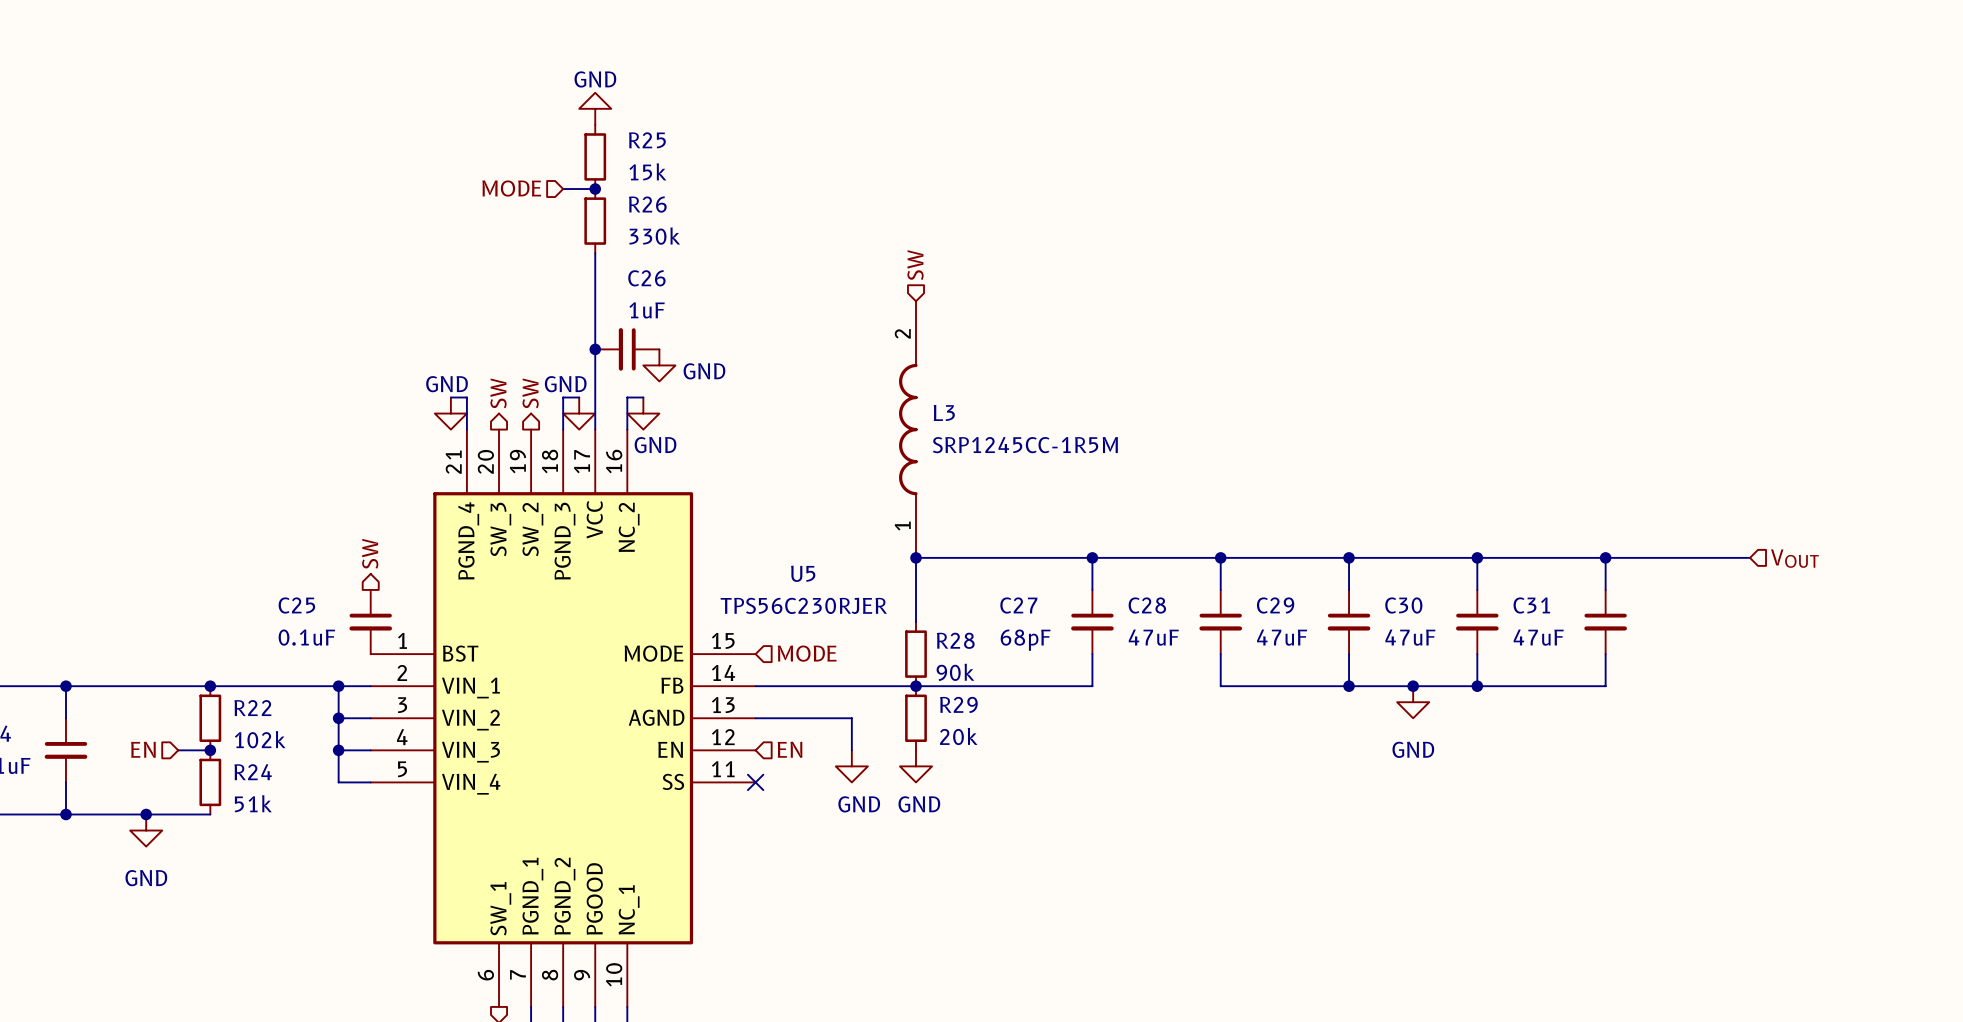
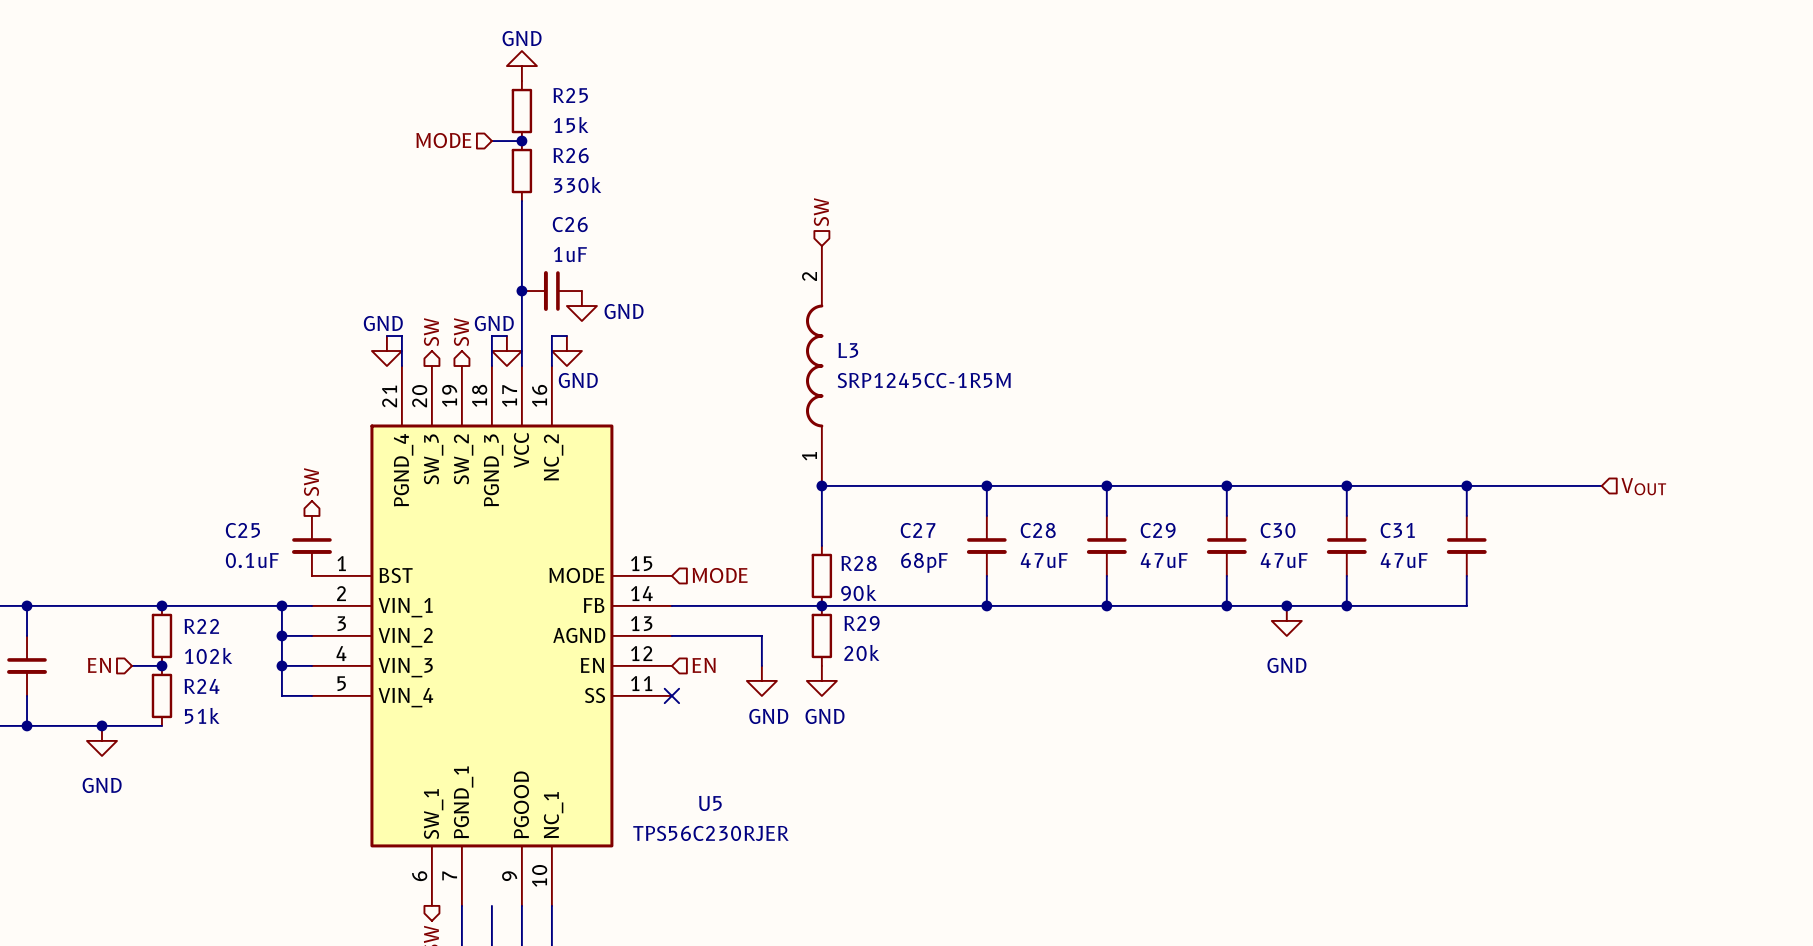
U5 symbol: [370, 429, 756, 1007] -> [311, 366, 672, 906]
U5 name position: U5 (803, 573) -> U5 (710, 803)
U5 value position: TPS56C230RJER (803, 605) -> TPS56C230RJER (710, 833)
wire: none -> (986, 605) (1106, 605)
junction: none -> (986, 605)
junction: none -> (1106, 605)

